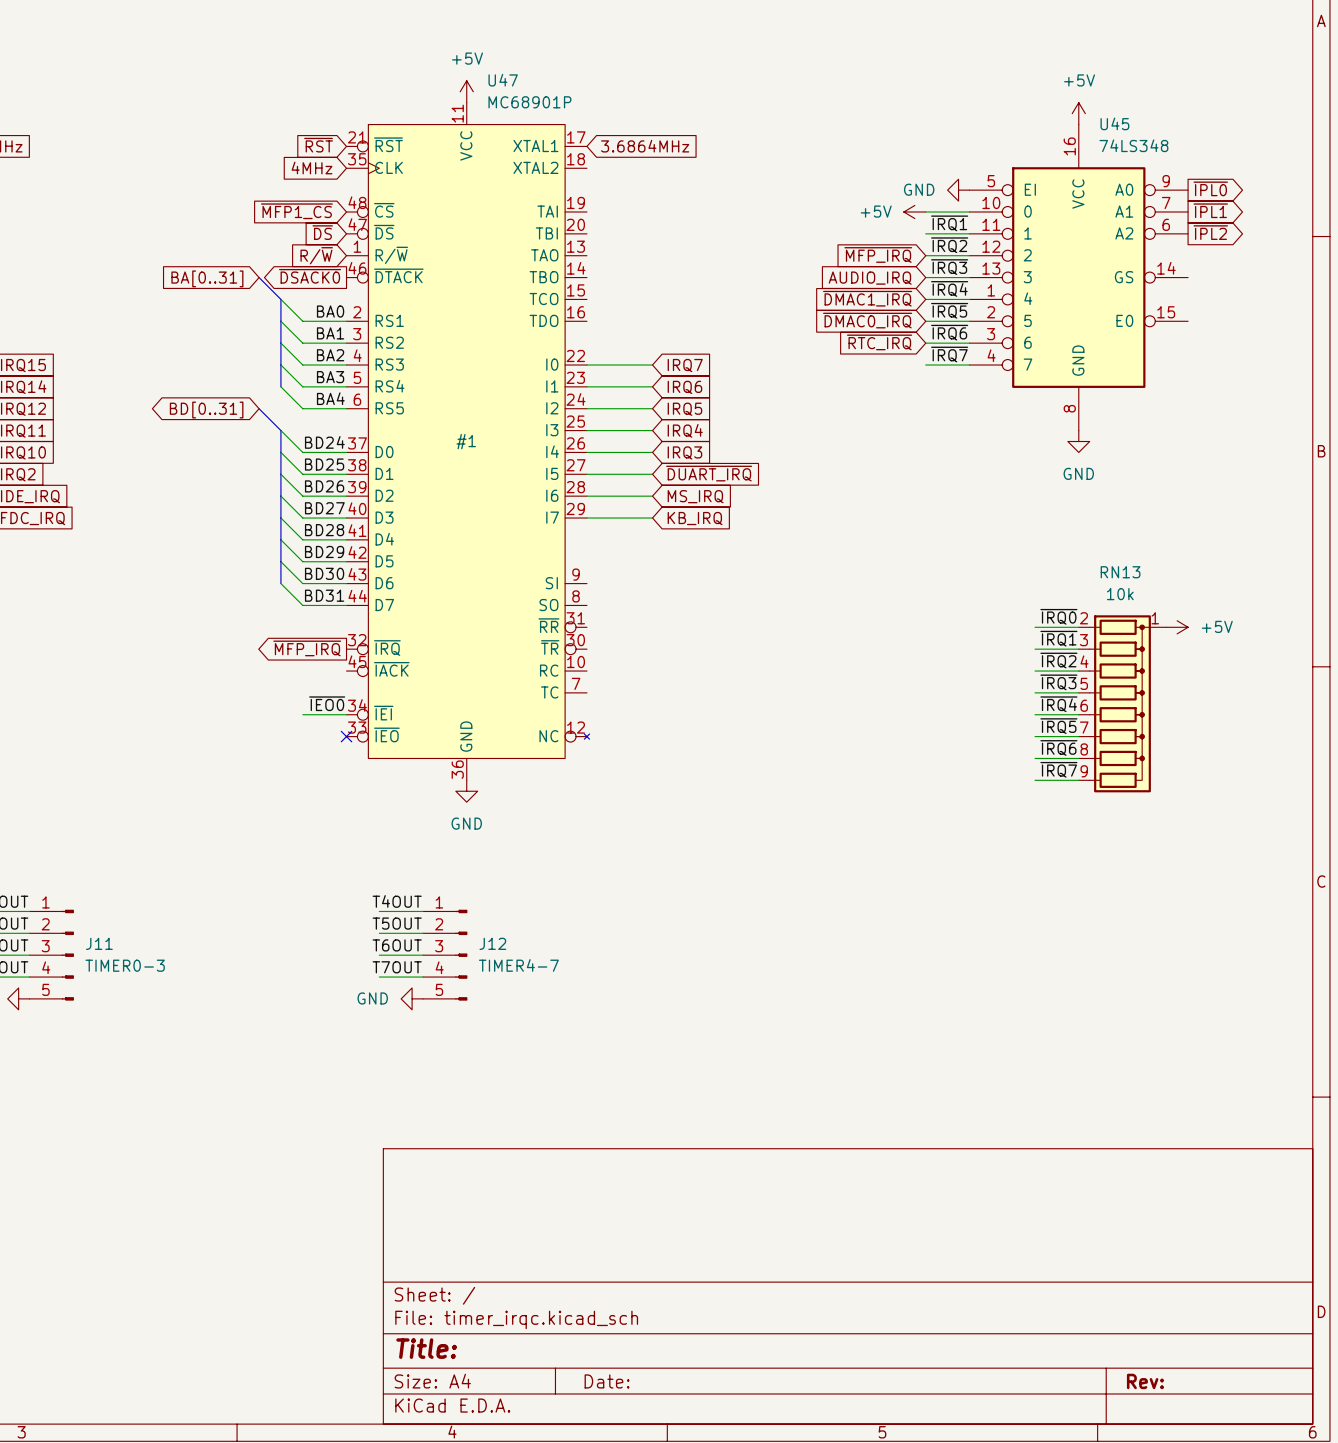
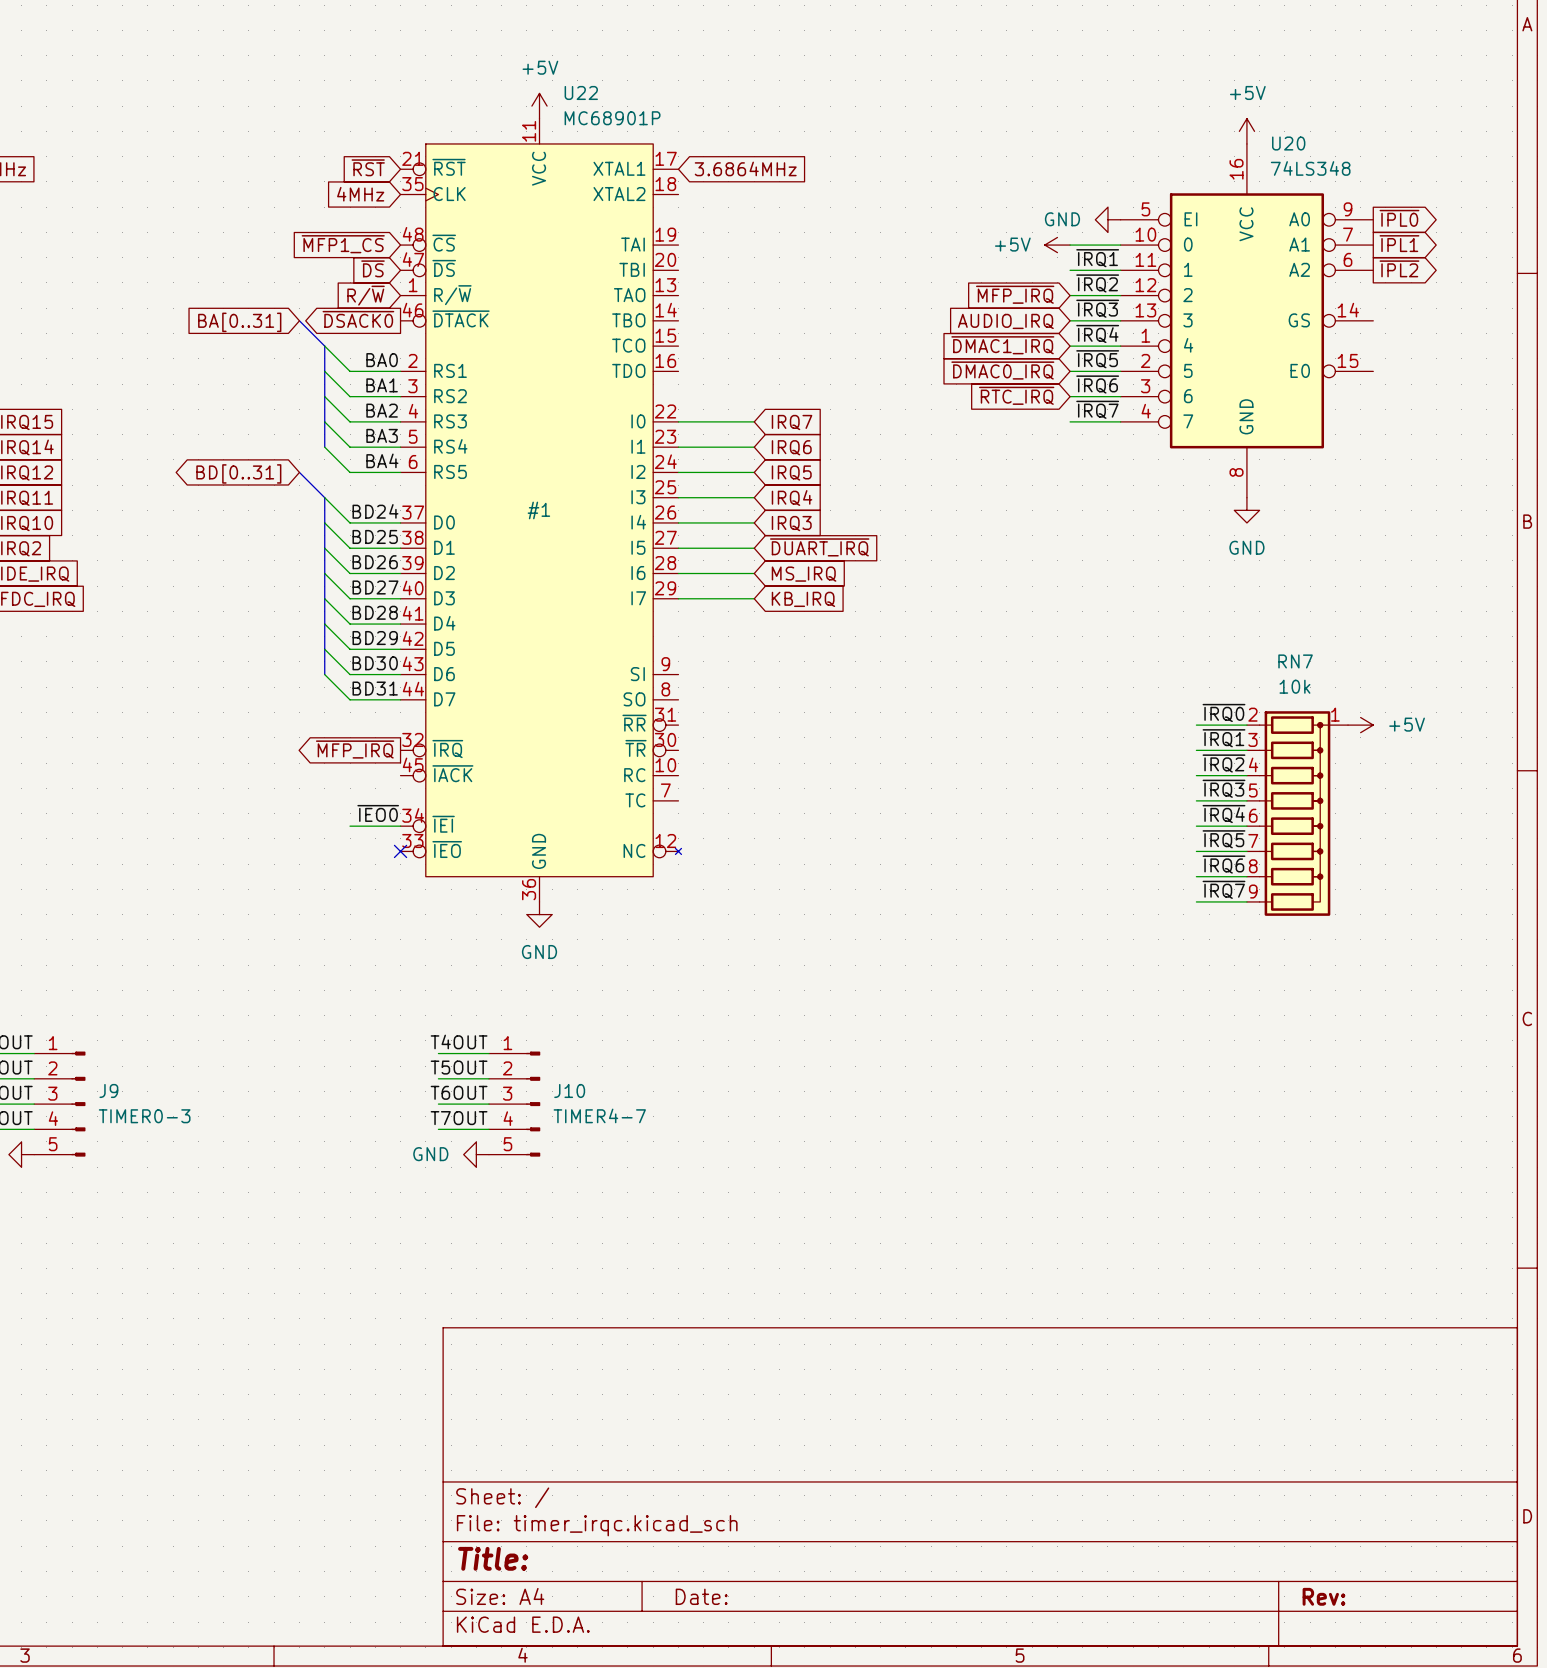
U47 name: U47 (503, 80) -> U22 (581, 92)
U45 name: U45 (1114, 123) -> U20 (1288, 143)
RN13 name: RN13 (1120, 572) -> RN7 (1295, 661)
J11 name: J11 (99, 943) -> J9 (108, 1090)
J12 name: J12 (492, 943) -> J10 (569, 1090)

